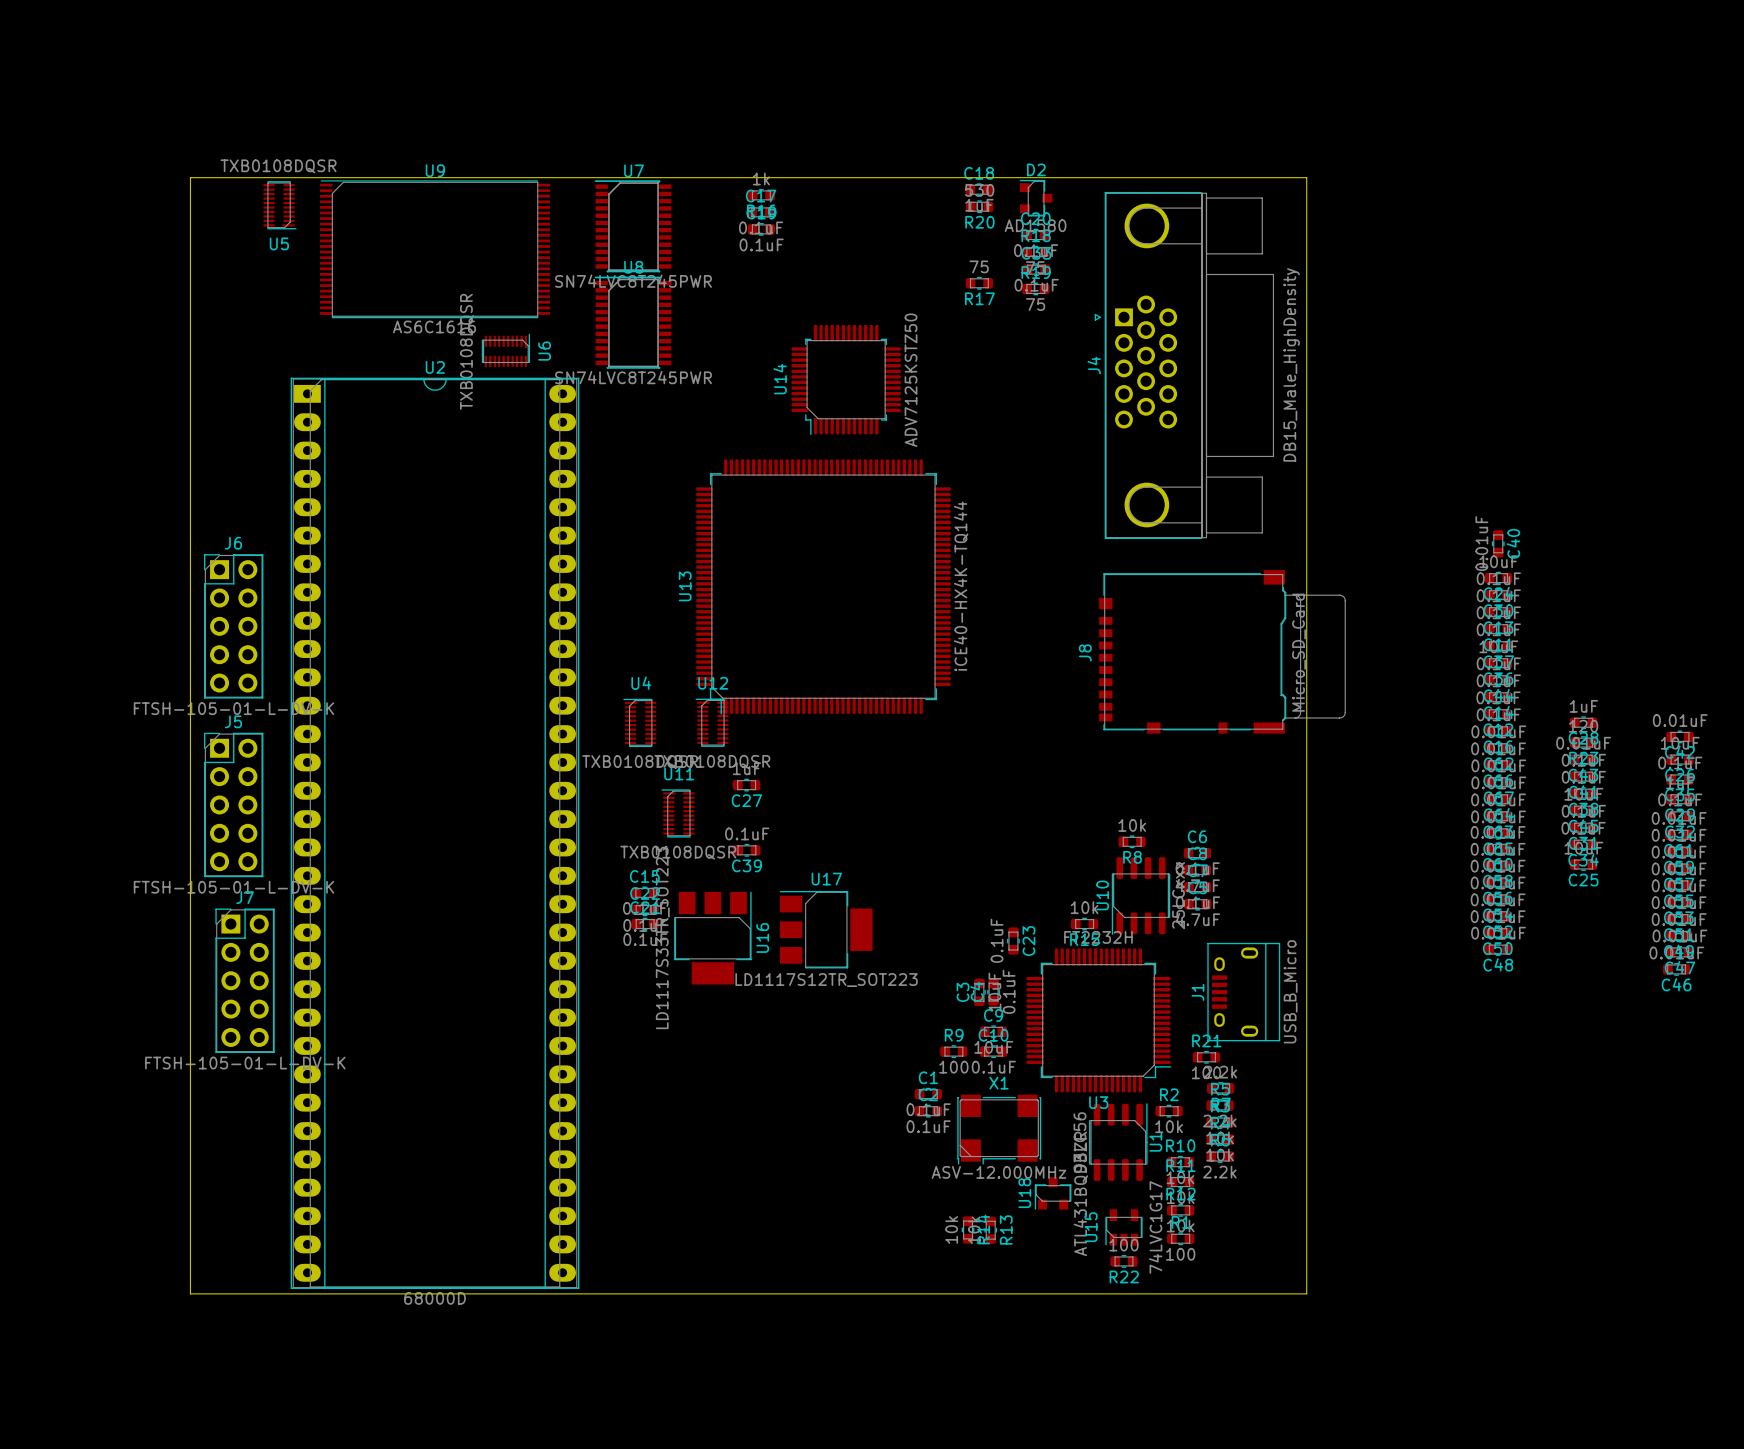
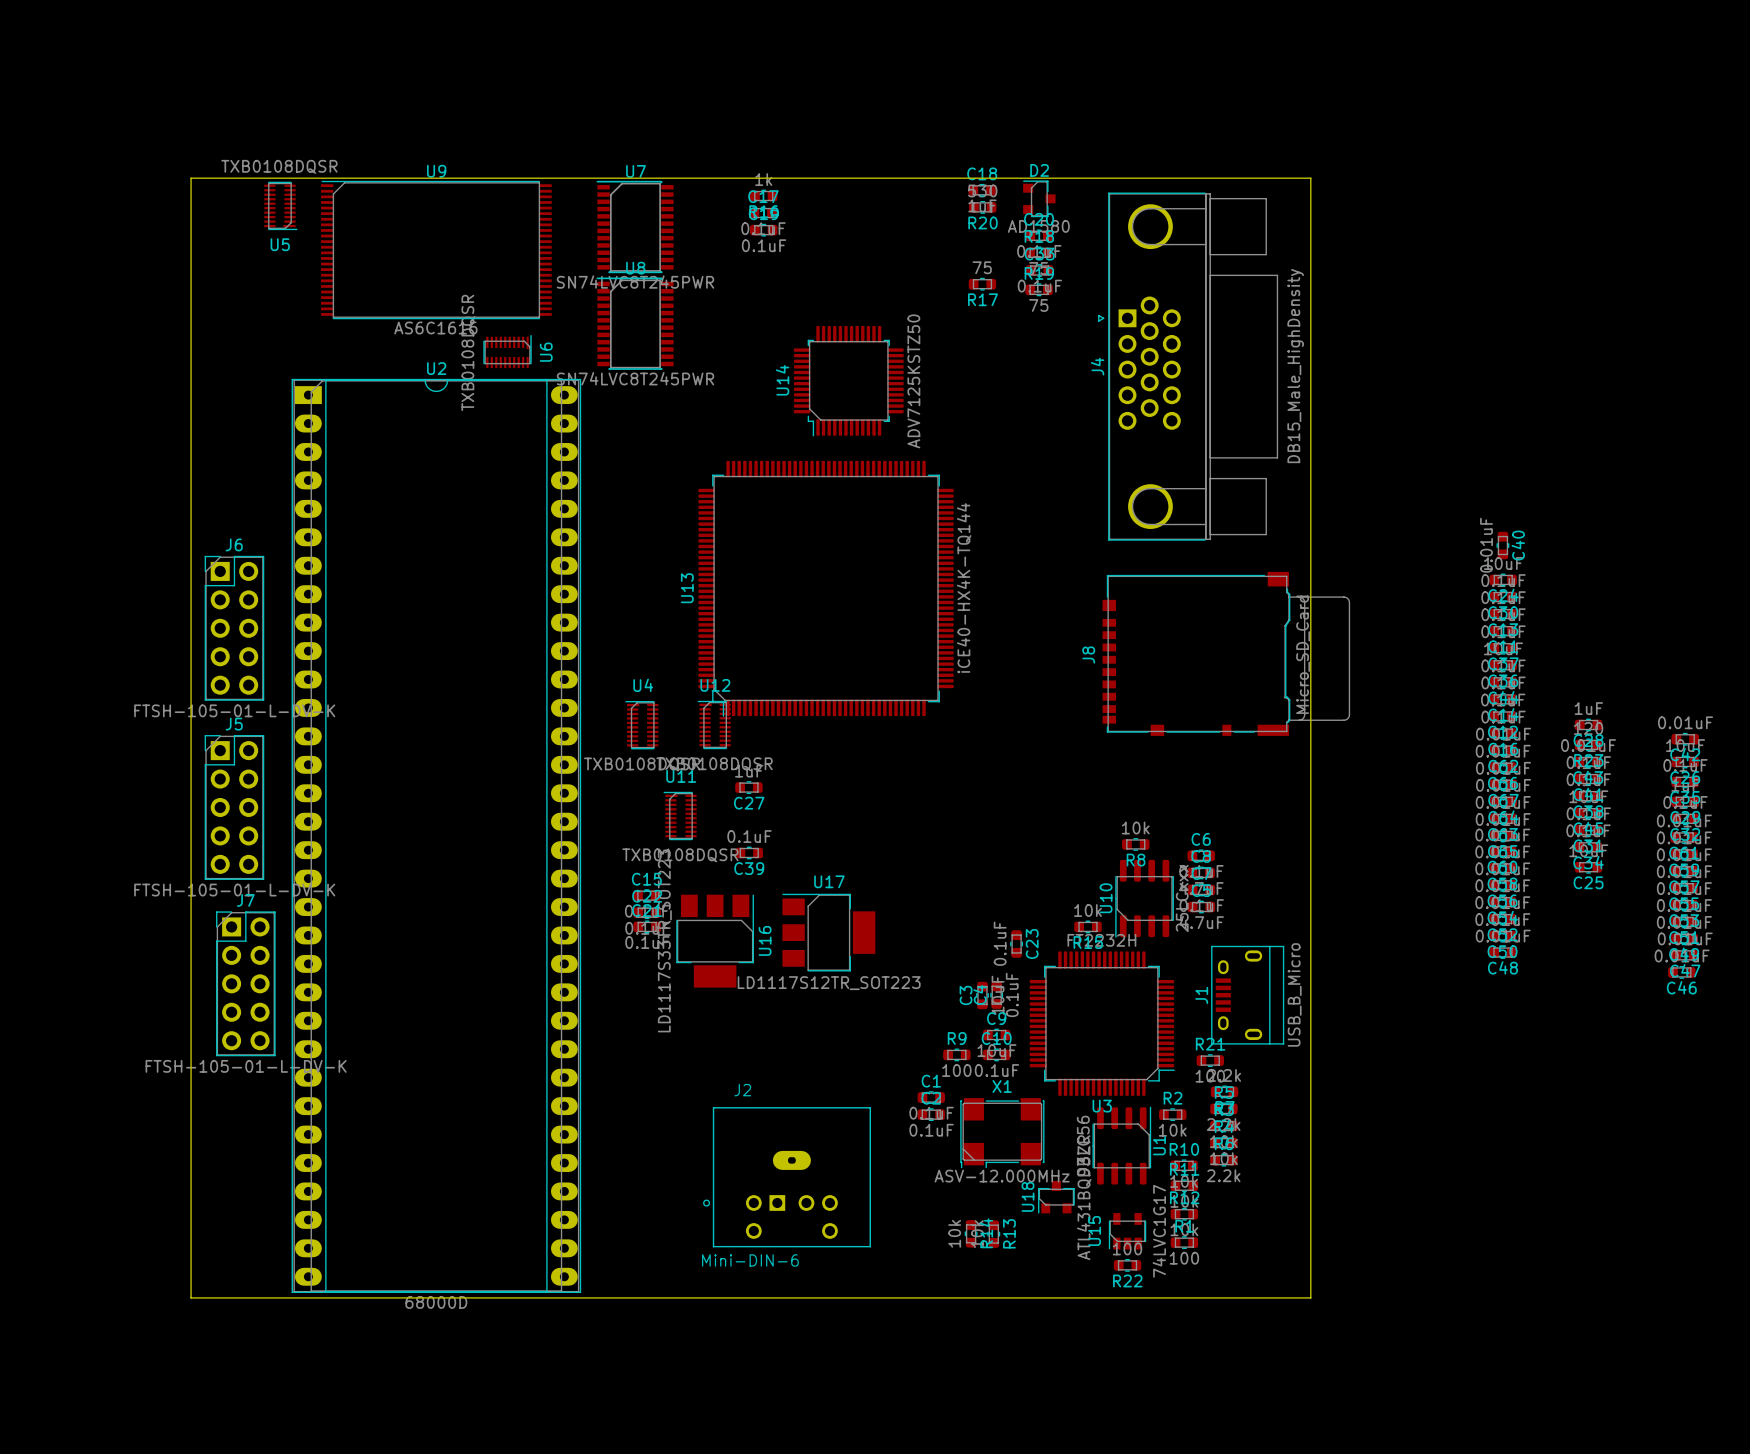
J2: none -> Mini-DIN-6 (787, 1177)

